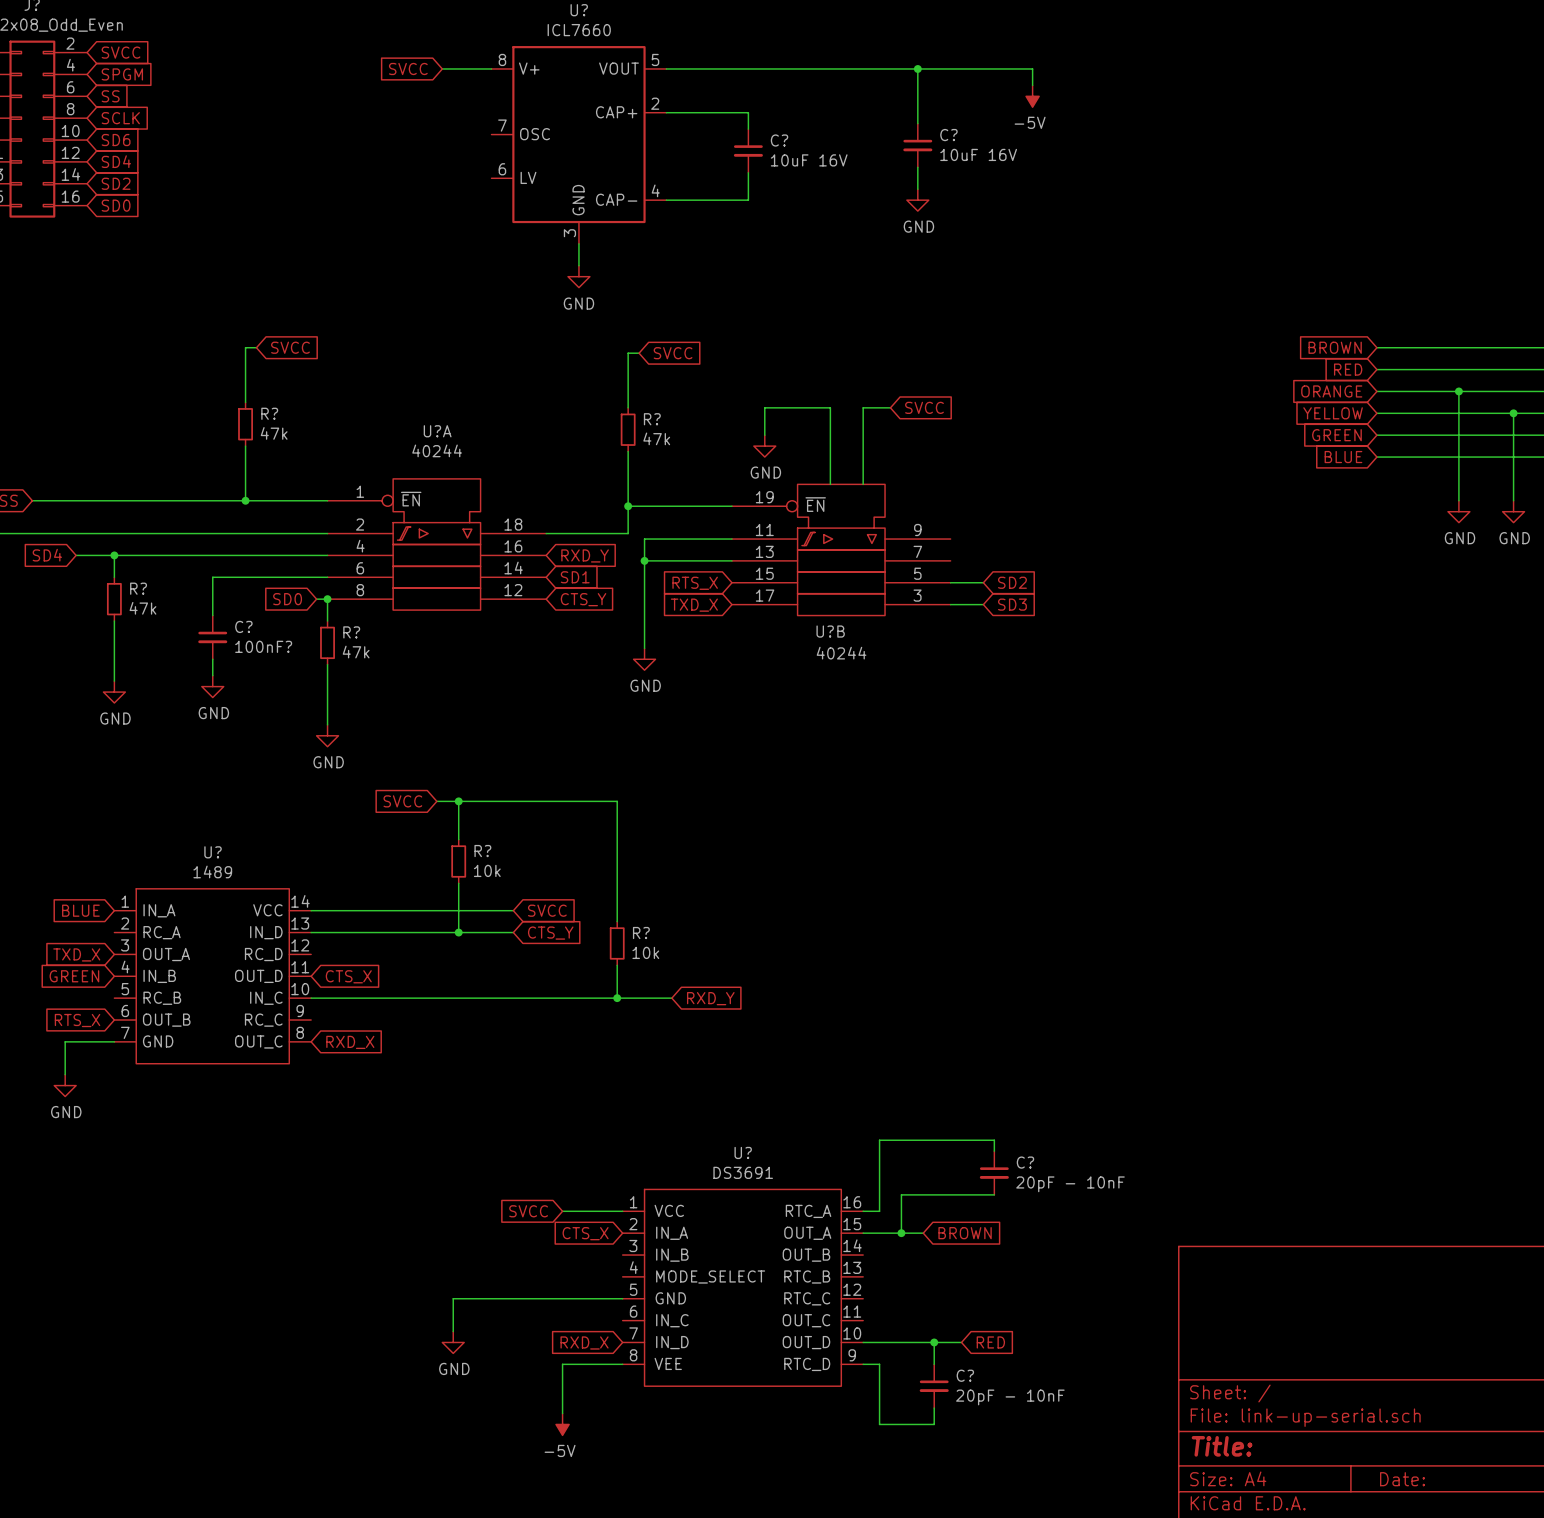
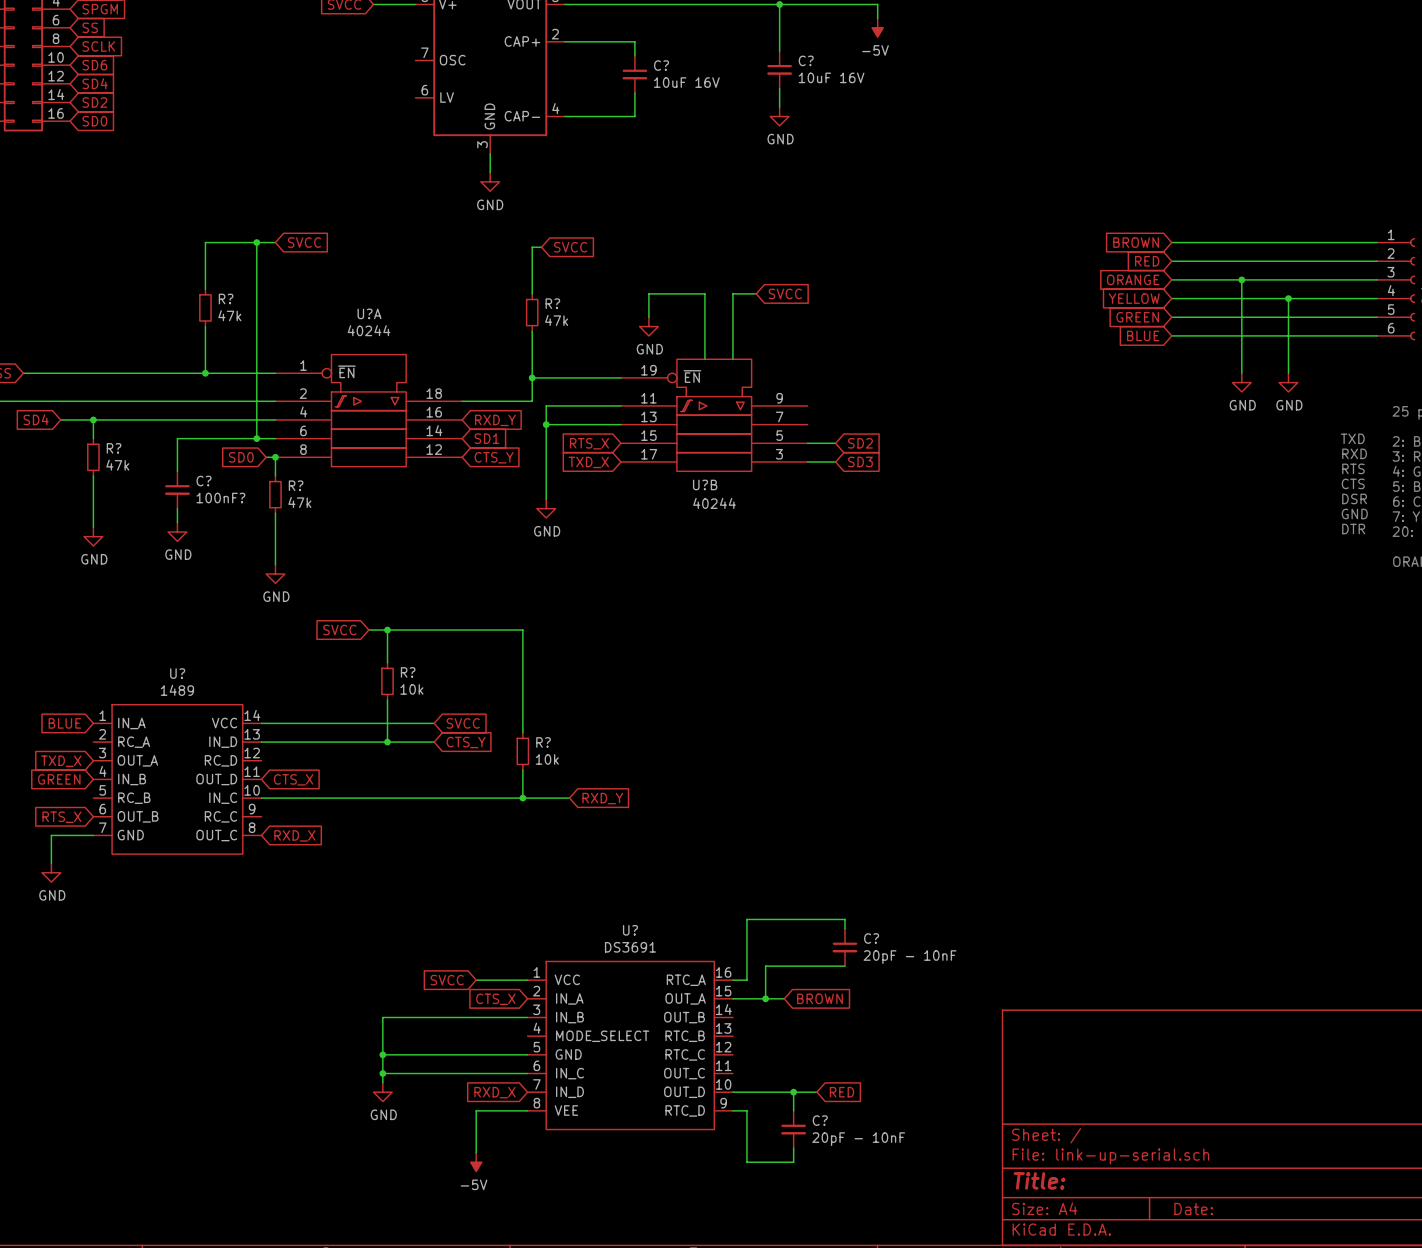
wire: none -> (214, 242) (275, 242)
global label position: SVCC (290, 347) -> SVCC (304, 242)
wire: none -> (256, 242) (256, 438)
junction: none -> (256, 242)
junction: none -> (256, 438)
wire: none -> (527, 1017) (382, 1017) (382, 1054)
junction: none -> (382, 1054)
wire: none -> (382, 1073) (527, 1073)
junction: none -> (382, 1073)

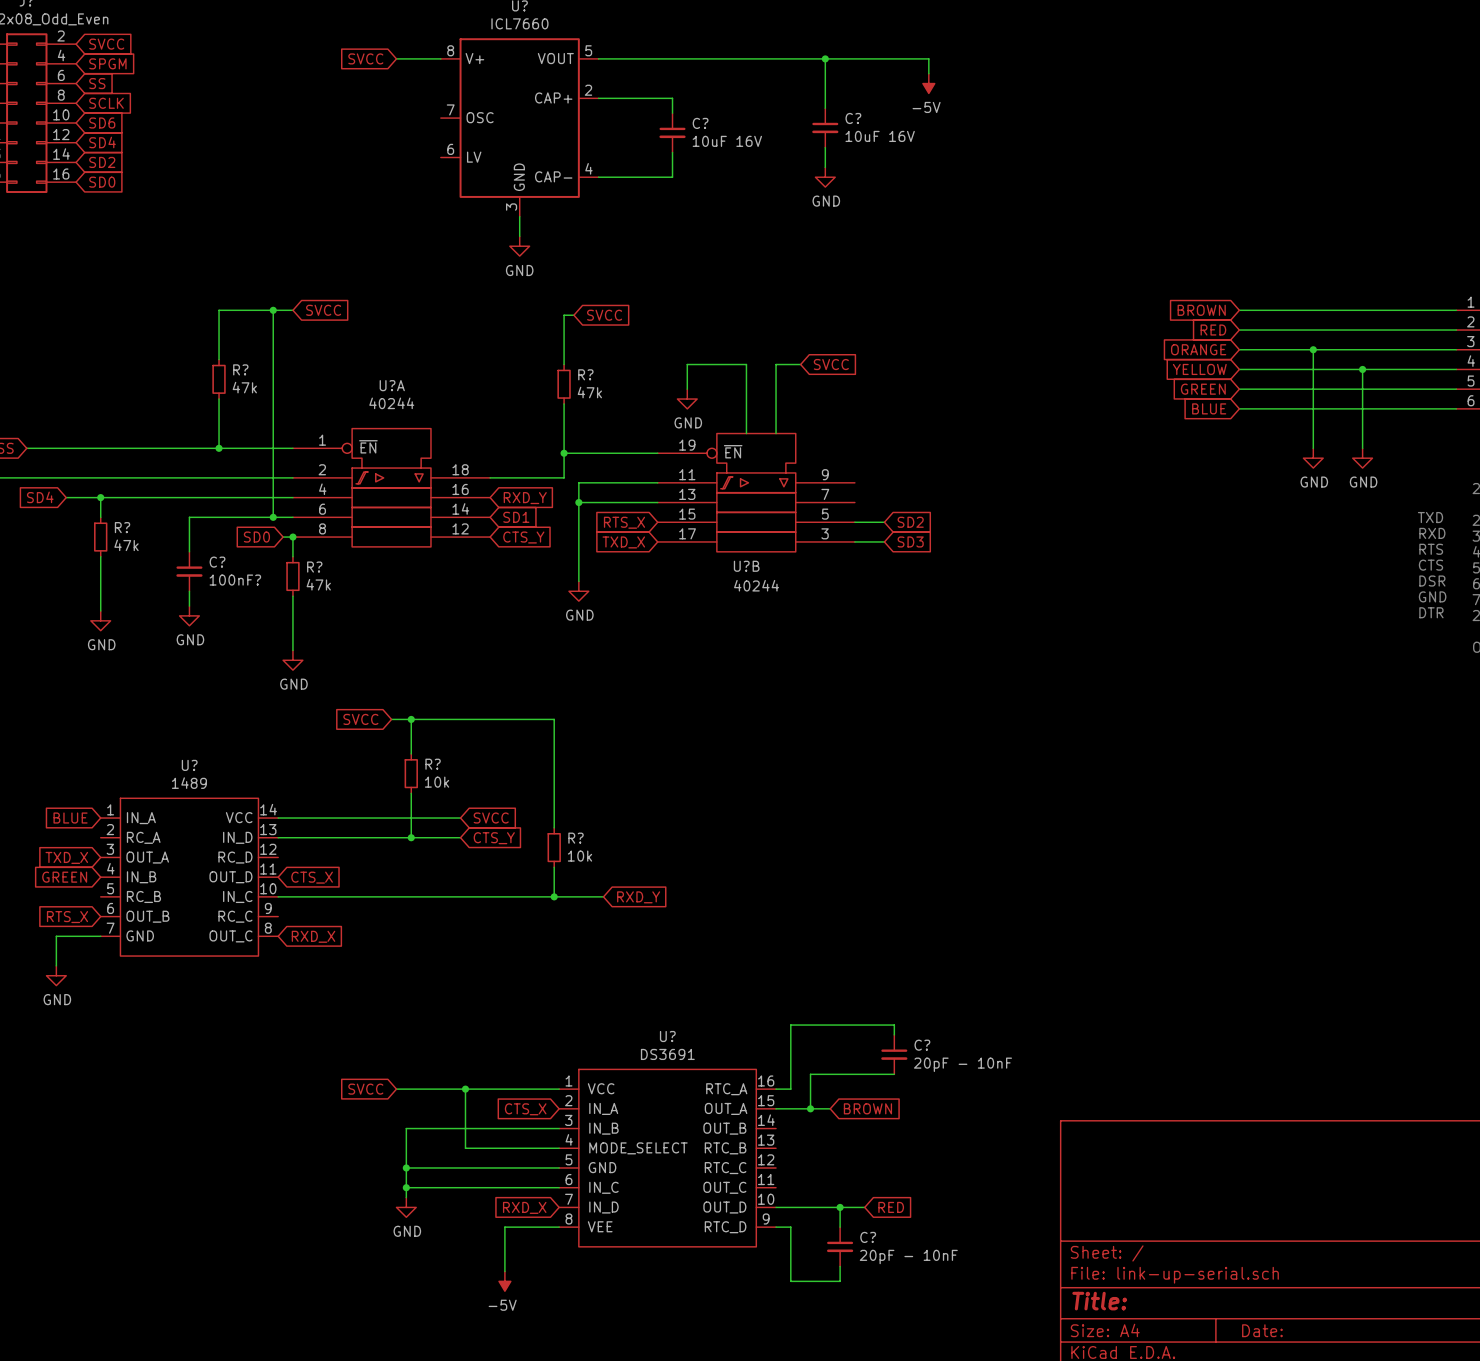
wire: none -> (396, 1089) (504, 1089)
wire: none -> (465, 1089) (465, 1148) (559, 1148)
junction: none -> (465, 1089)
global label position: SVCC (447, 980) -> SVCC (365, 1089)

